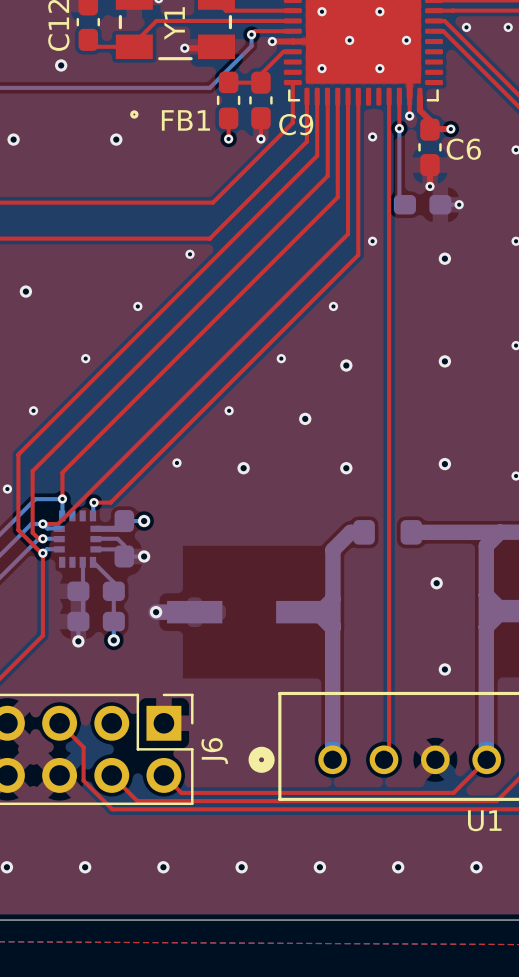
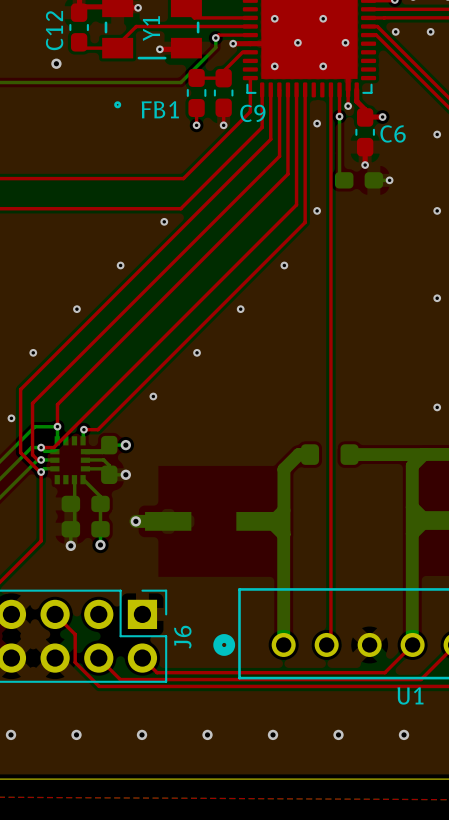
via: (13, 139) -> none
via: (116, 139) -> none
via: (444, 258) -> none
via: (25, 291) -> none
via: (444, 361) -> none
via: (346, 365) -> none
via: (305, 418) -> none
via: (444, 464) -> none
via: (243, 468) -> none
via: (346, 468) -> none
via: (436, 583) -> none
via: (444, 669) -> none

